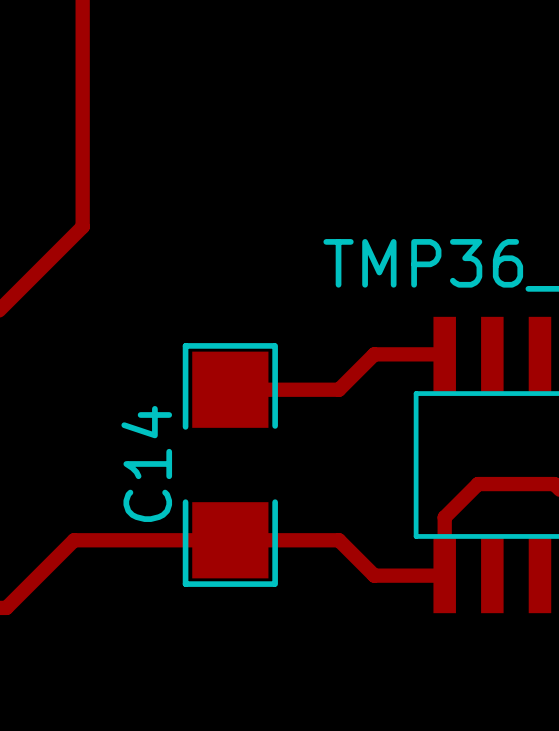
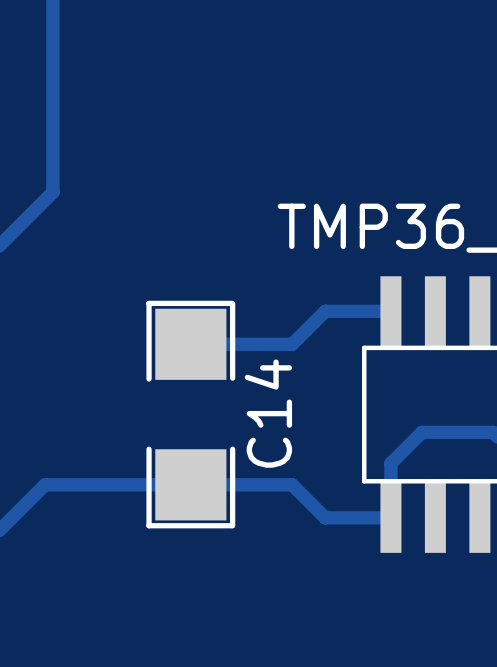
C14 name position: C14 (146, 463) -> C14 (268, 413)

